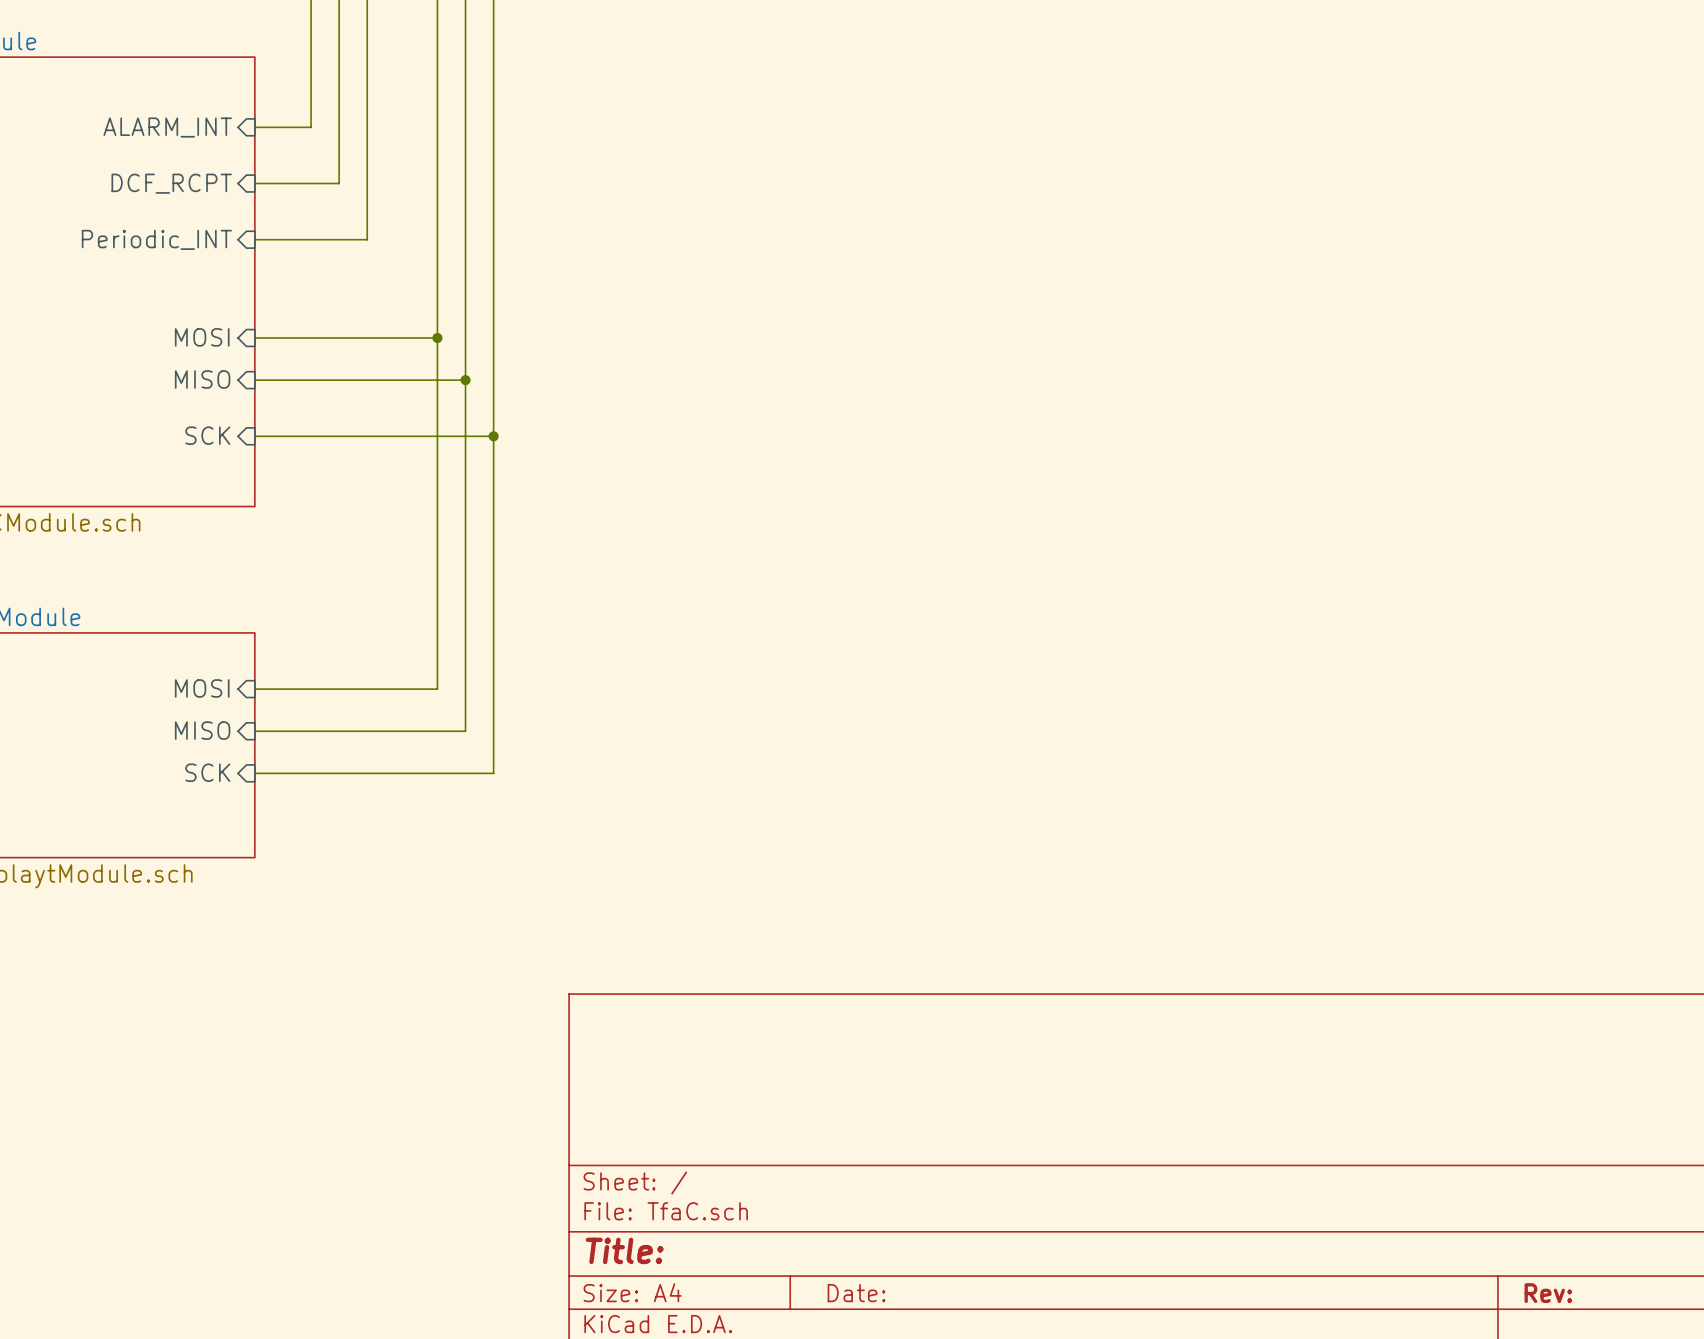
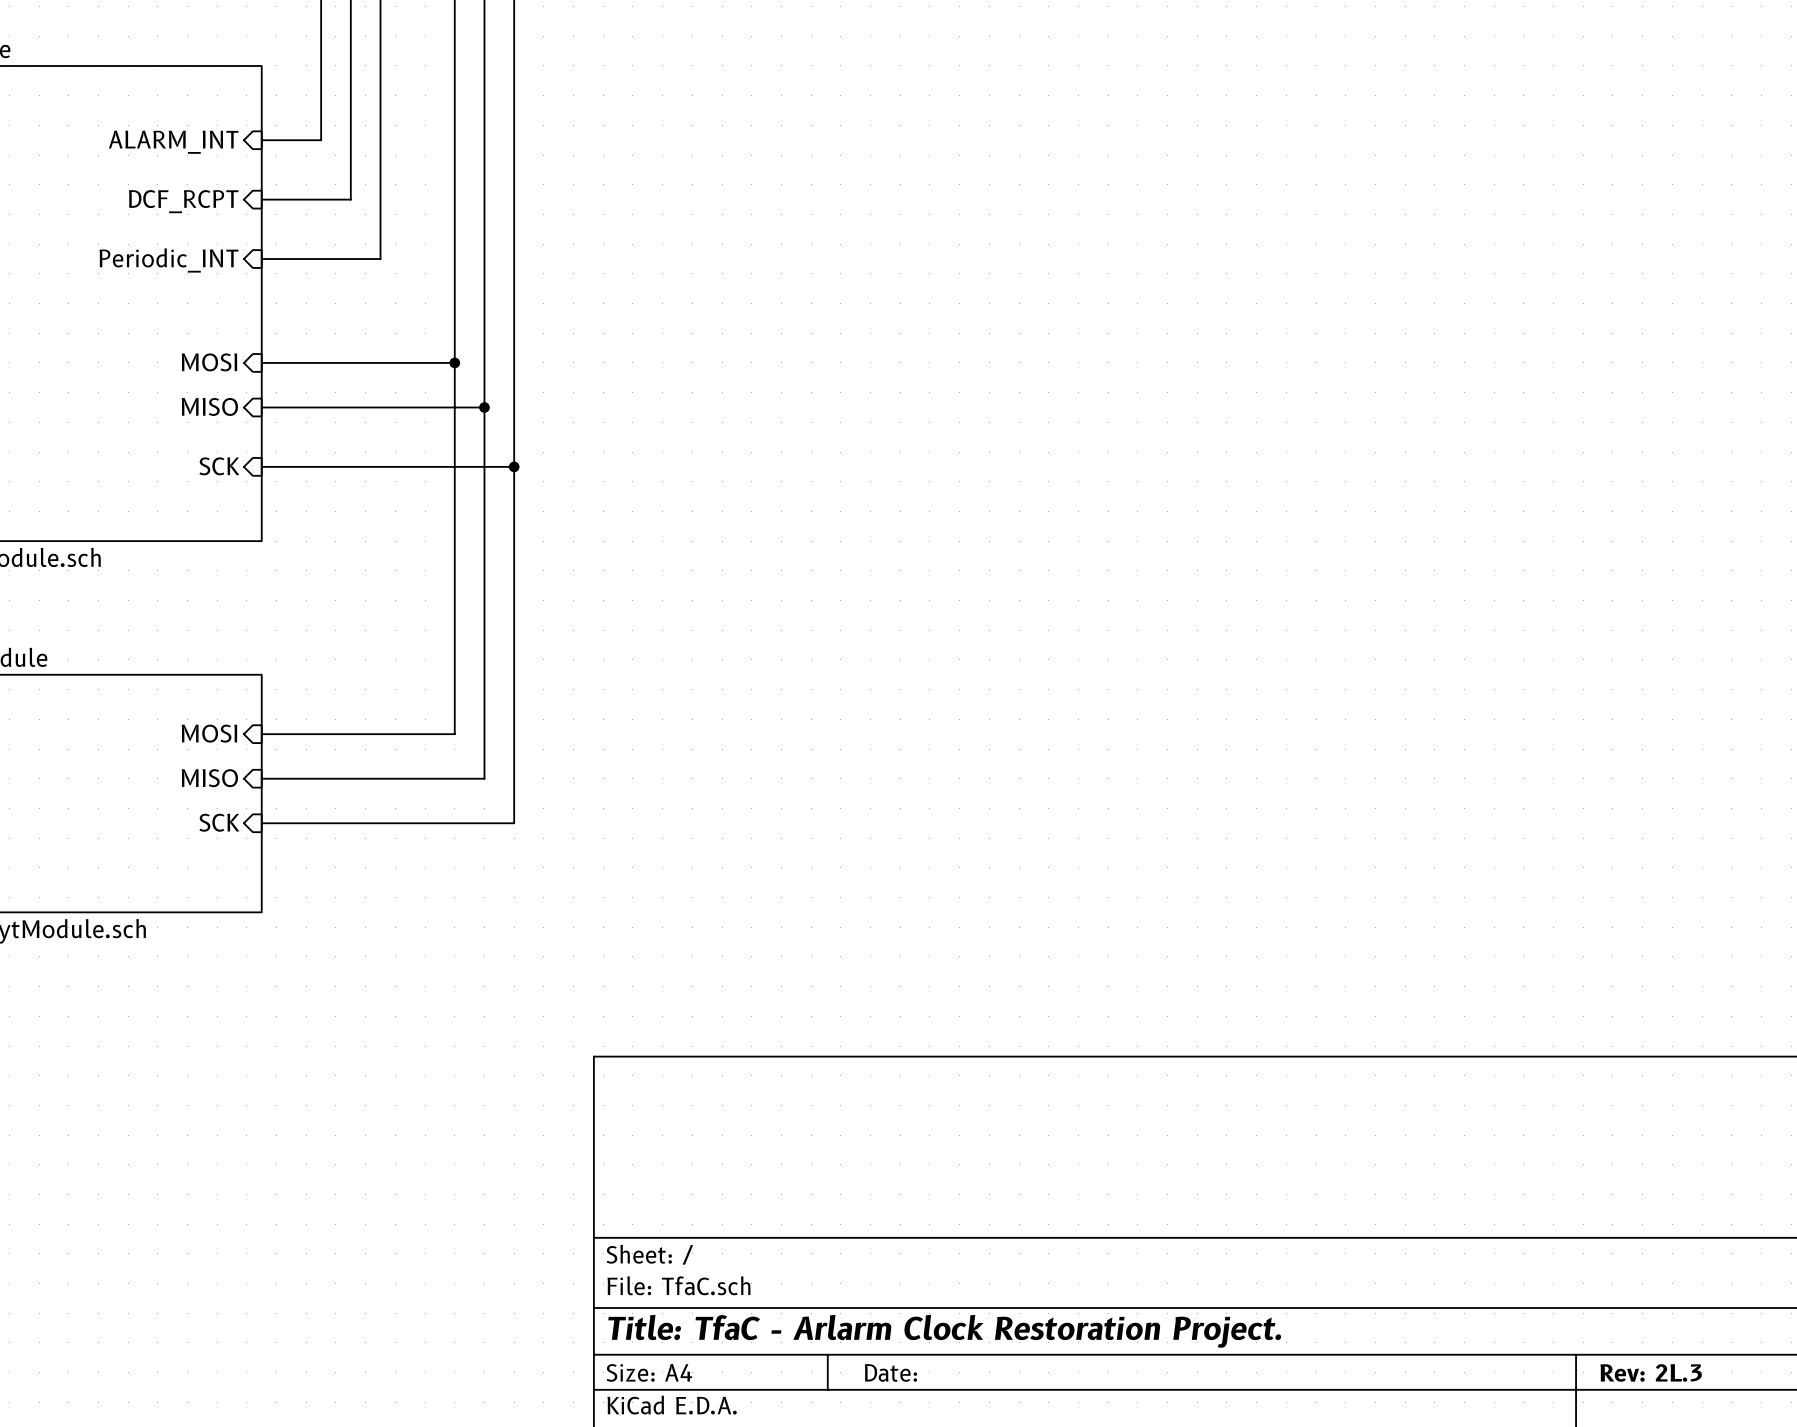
title block: Title: (624, 1250) -> Title: TfaC - Arlarm Clock Restoration Project. (944, 1331)
title block: Rev: (1548, 1293) -> Rev: 2L.3 (1651, 1372)

